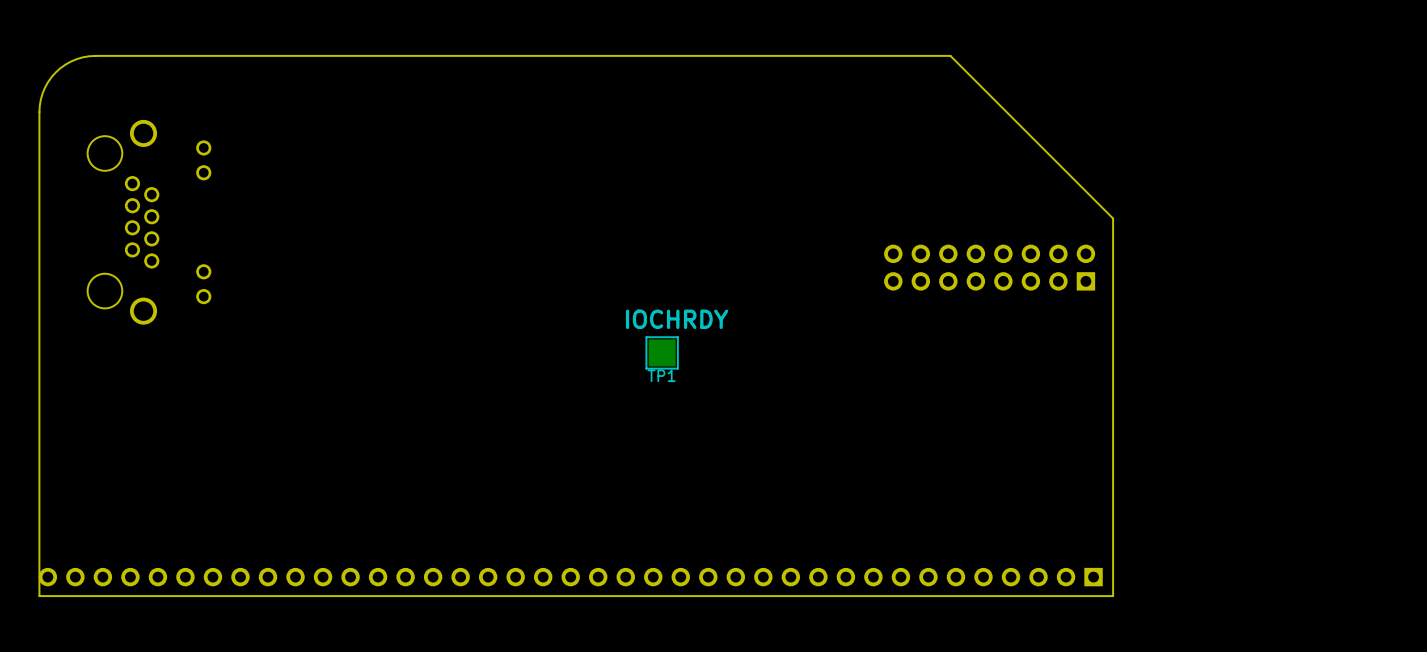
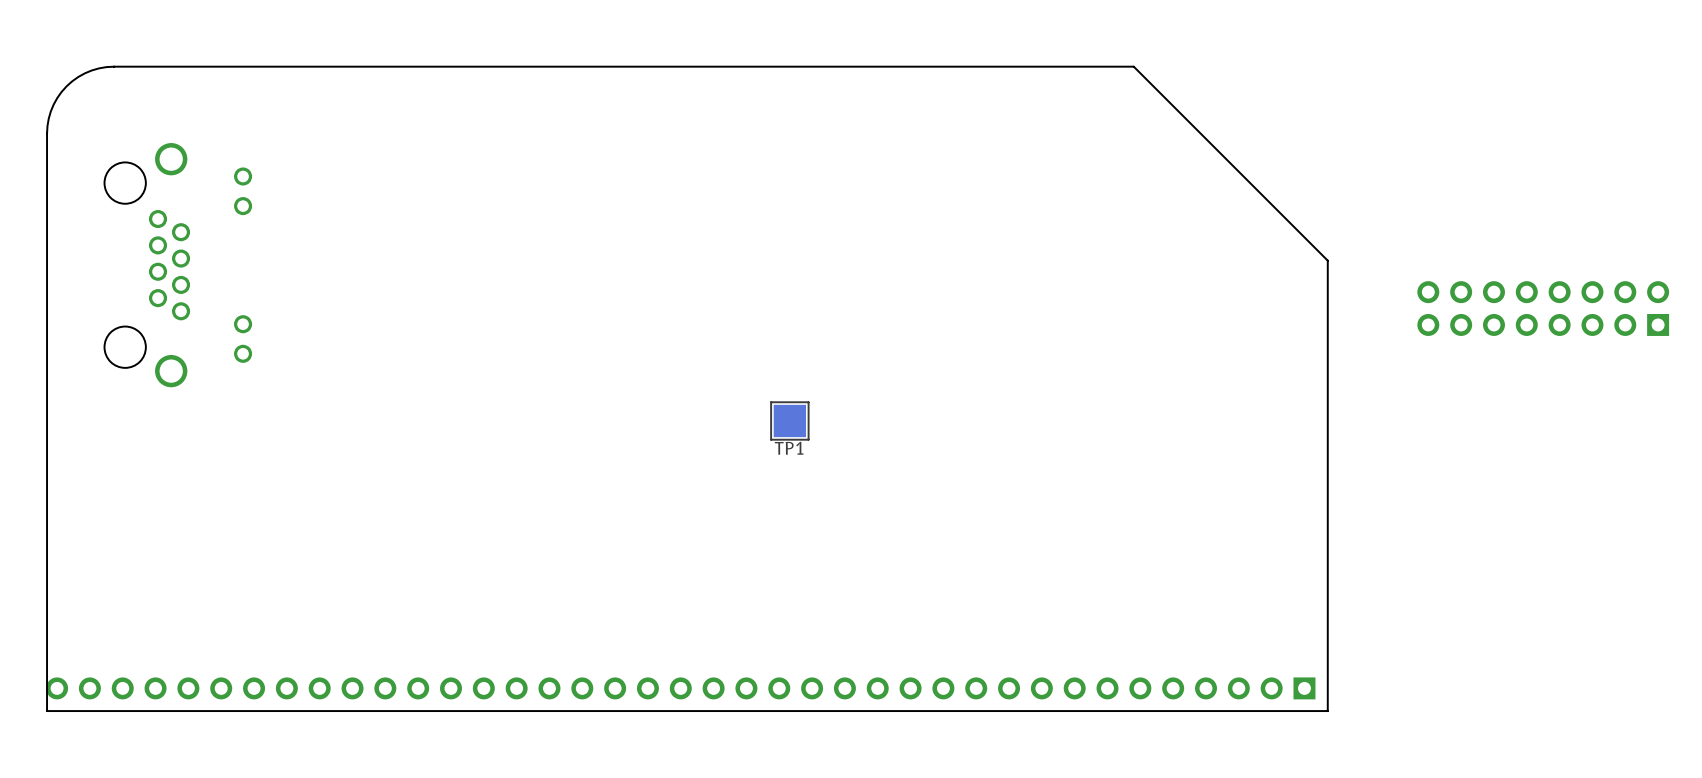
part: none -> (1543, 308)
part: (989, 267) -> none
text: IOCHRDY (677, 319) -> none

